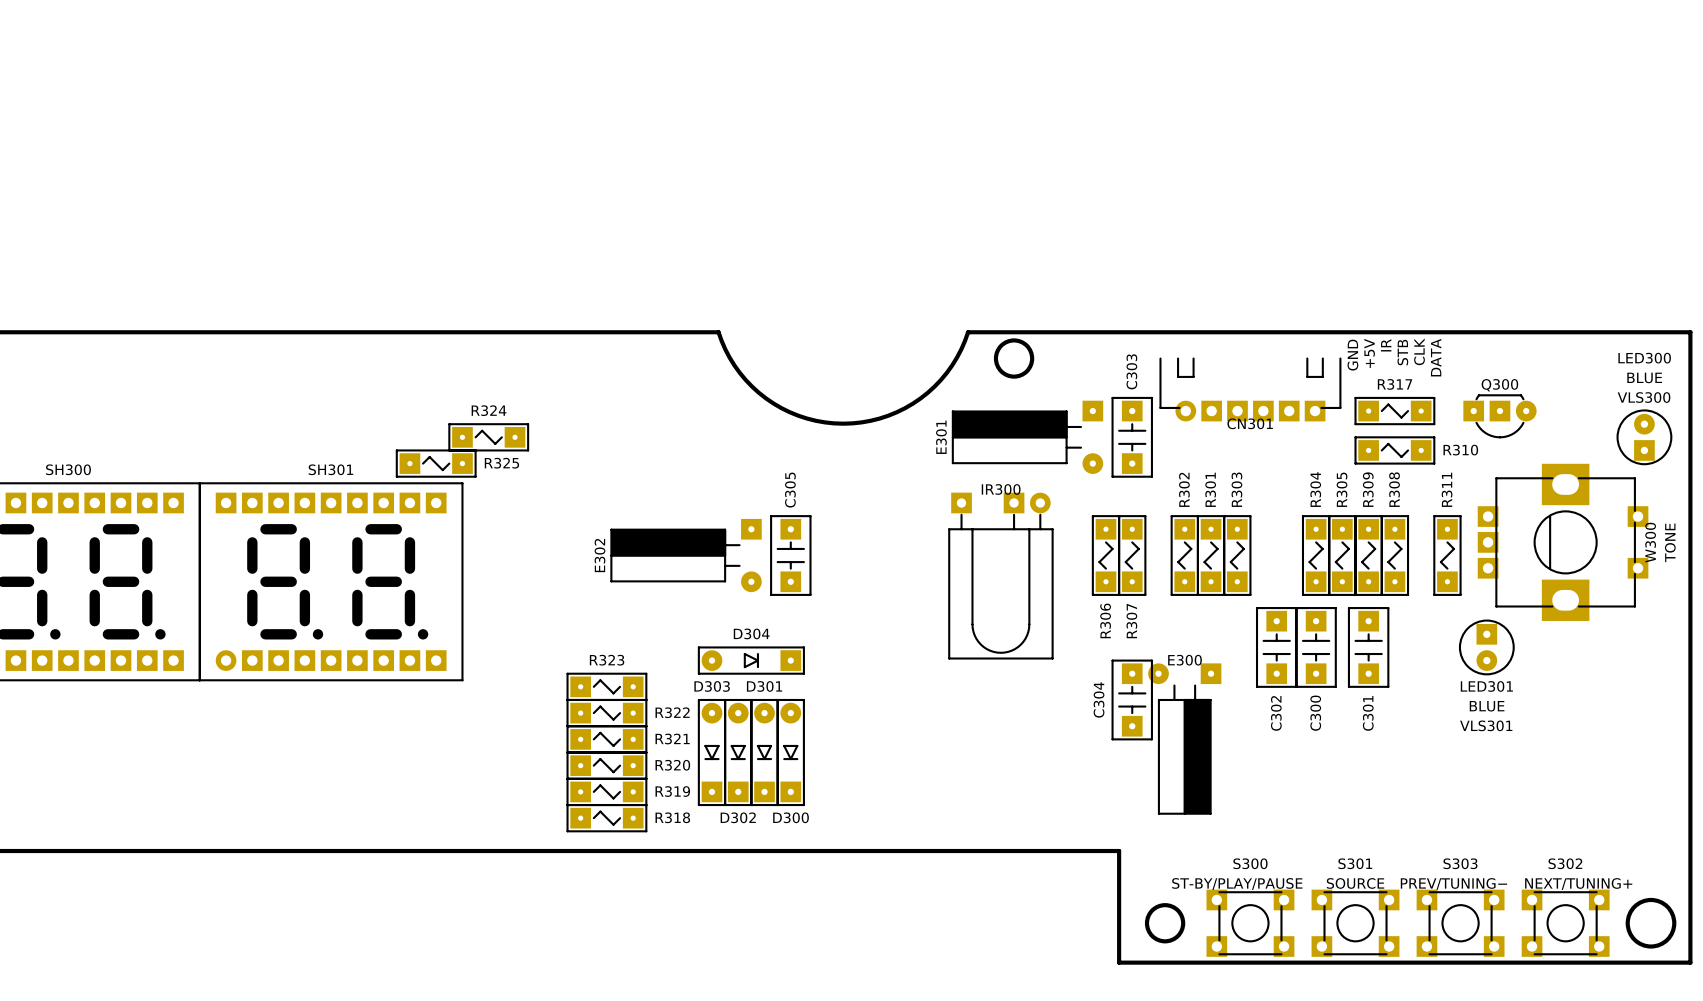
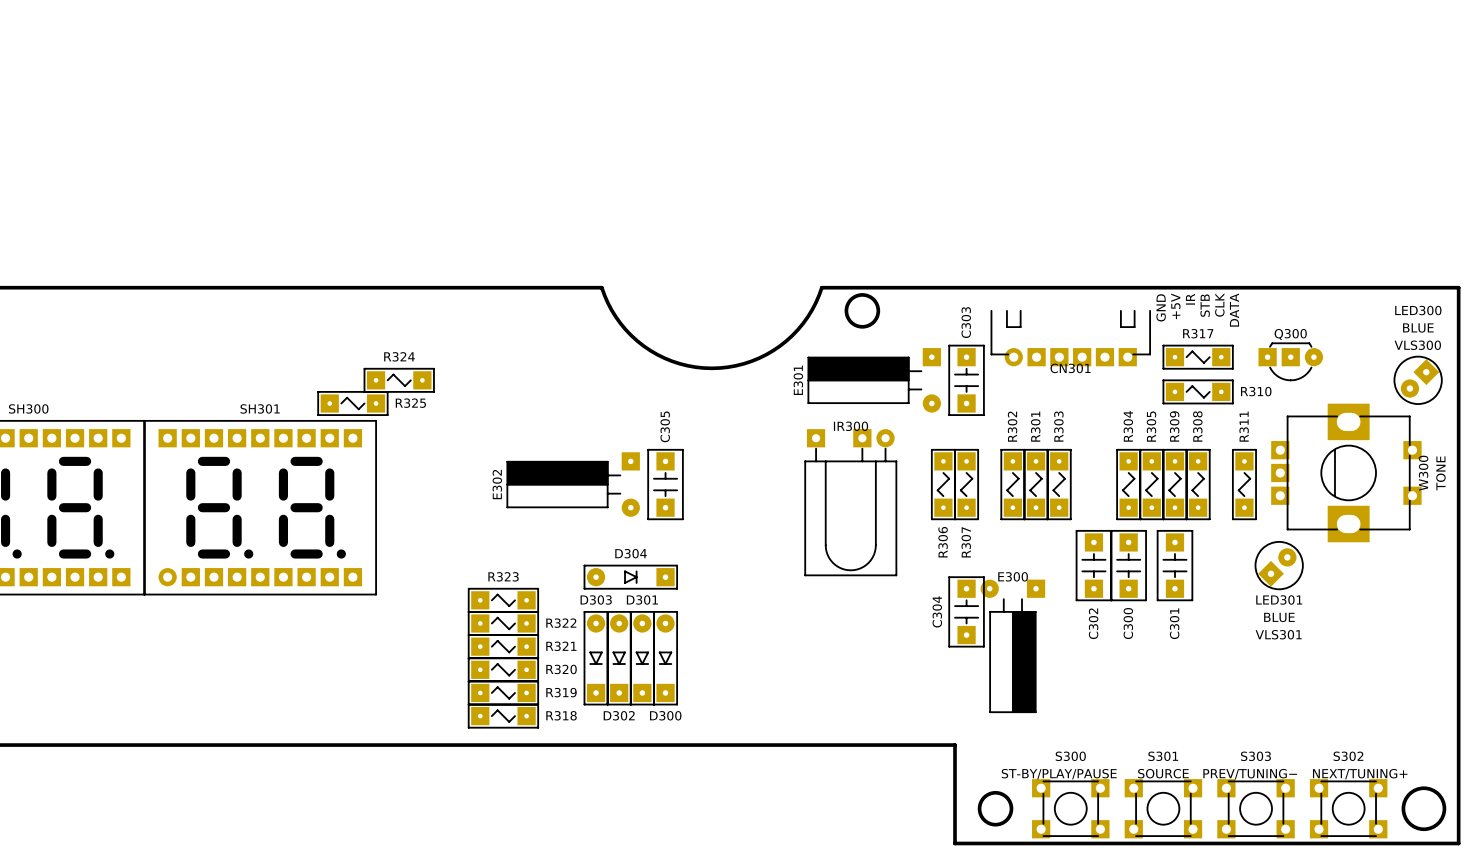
LED300 rotation: 0° (1644, 437) -> 135° counterclockwise (1420, 378)
LED301 rotation: 0° (1486, 647) -> 135° counterclockwise (1277, 567)

